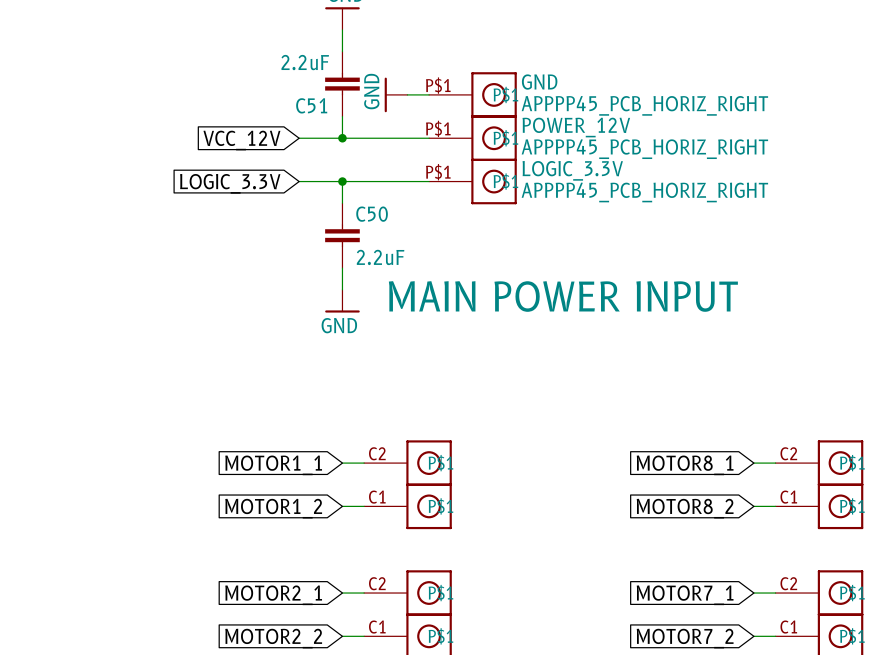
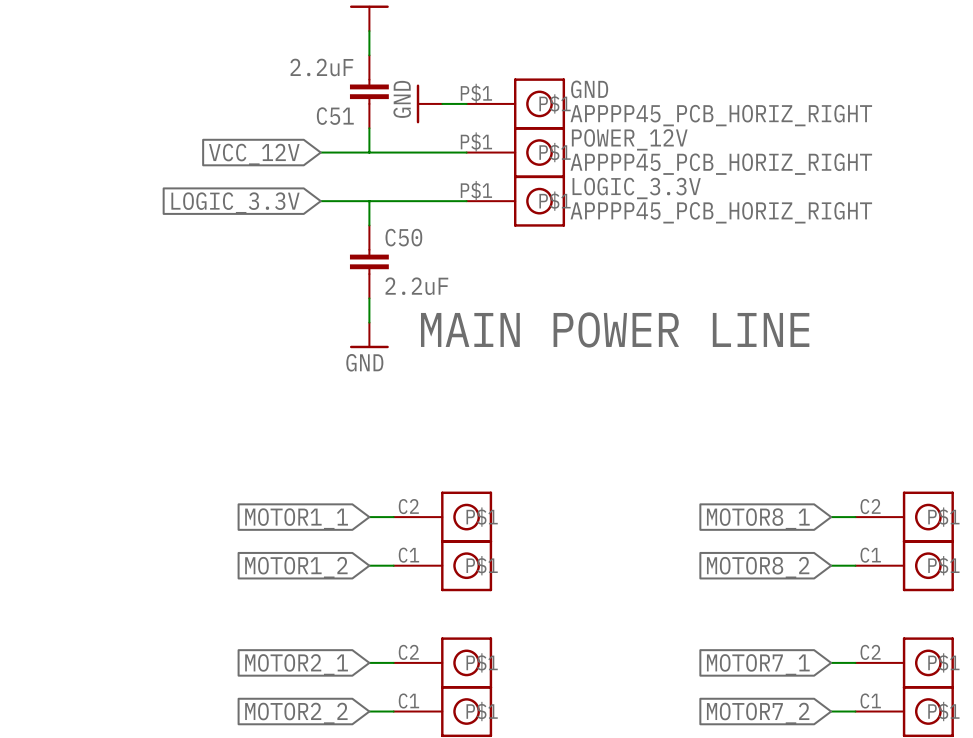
junction: (342, 138) -> none
junction: (342, 181) -> none
text: MAIN POWER INPUT (563, 296) -> MAIN POWER LINE (615, 329)

